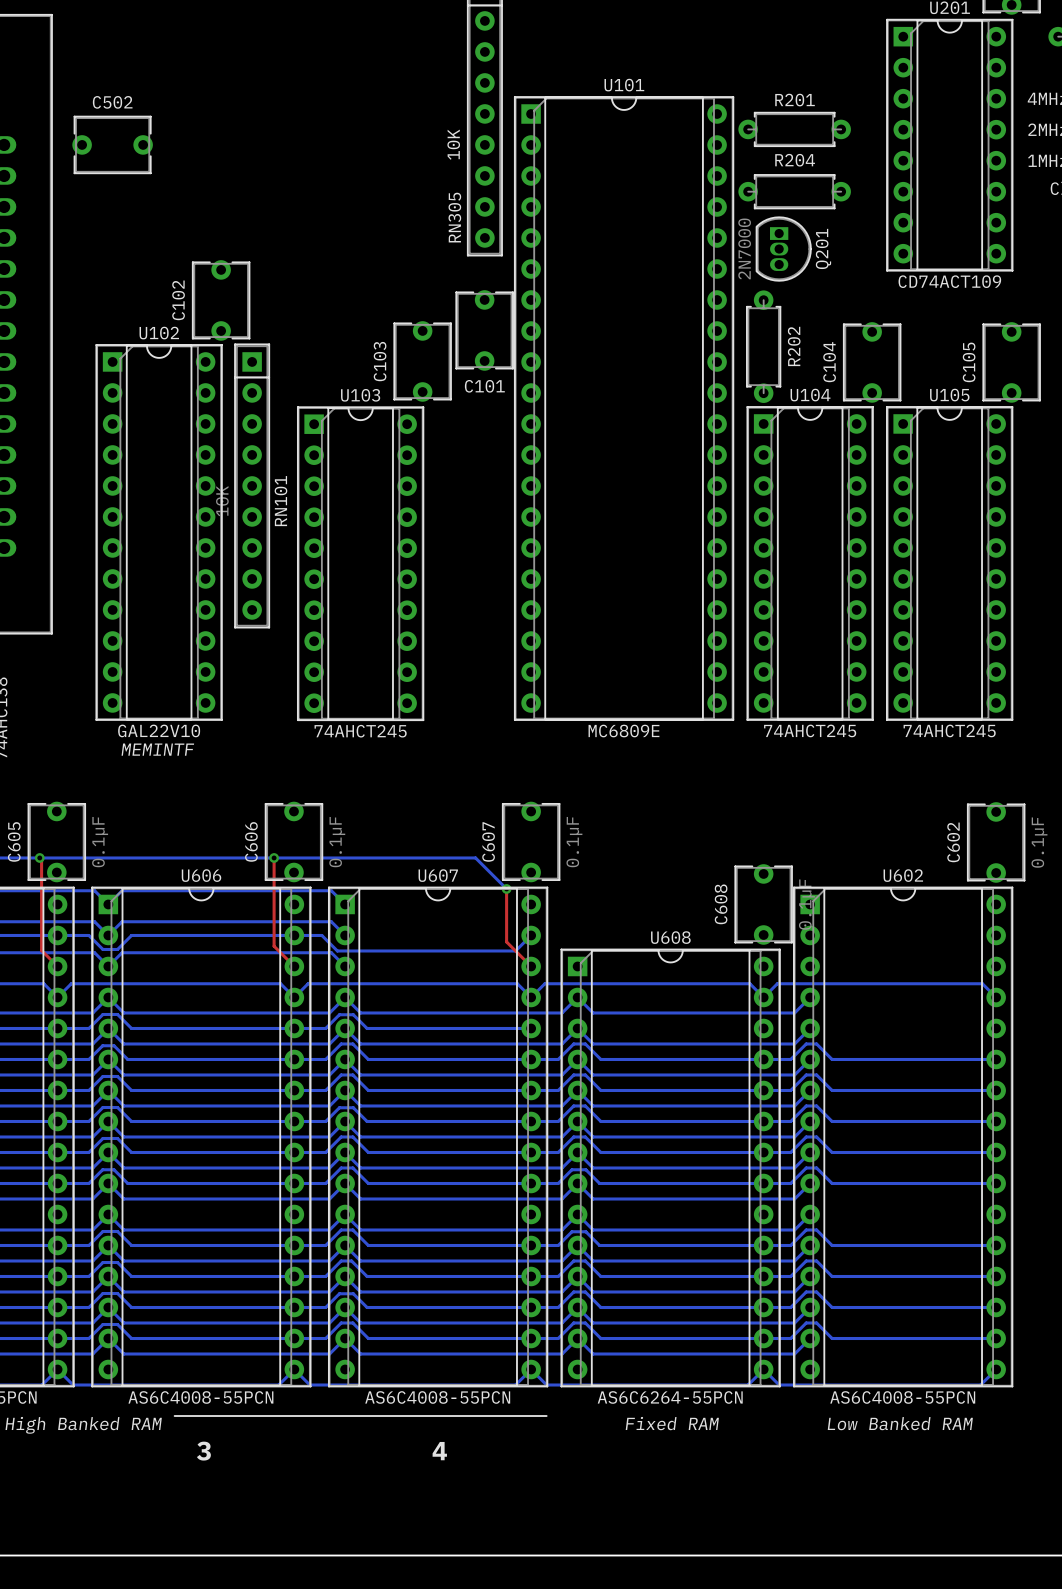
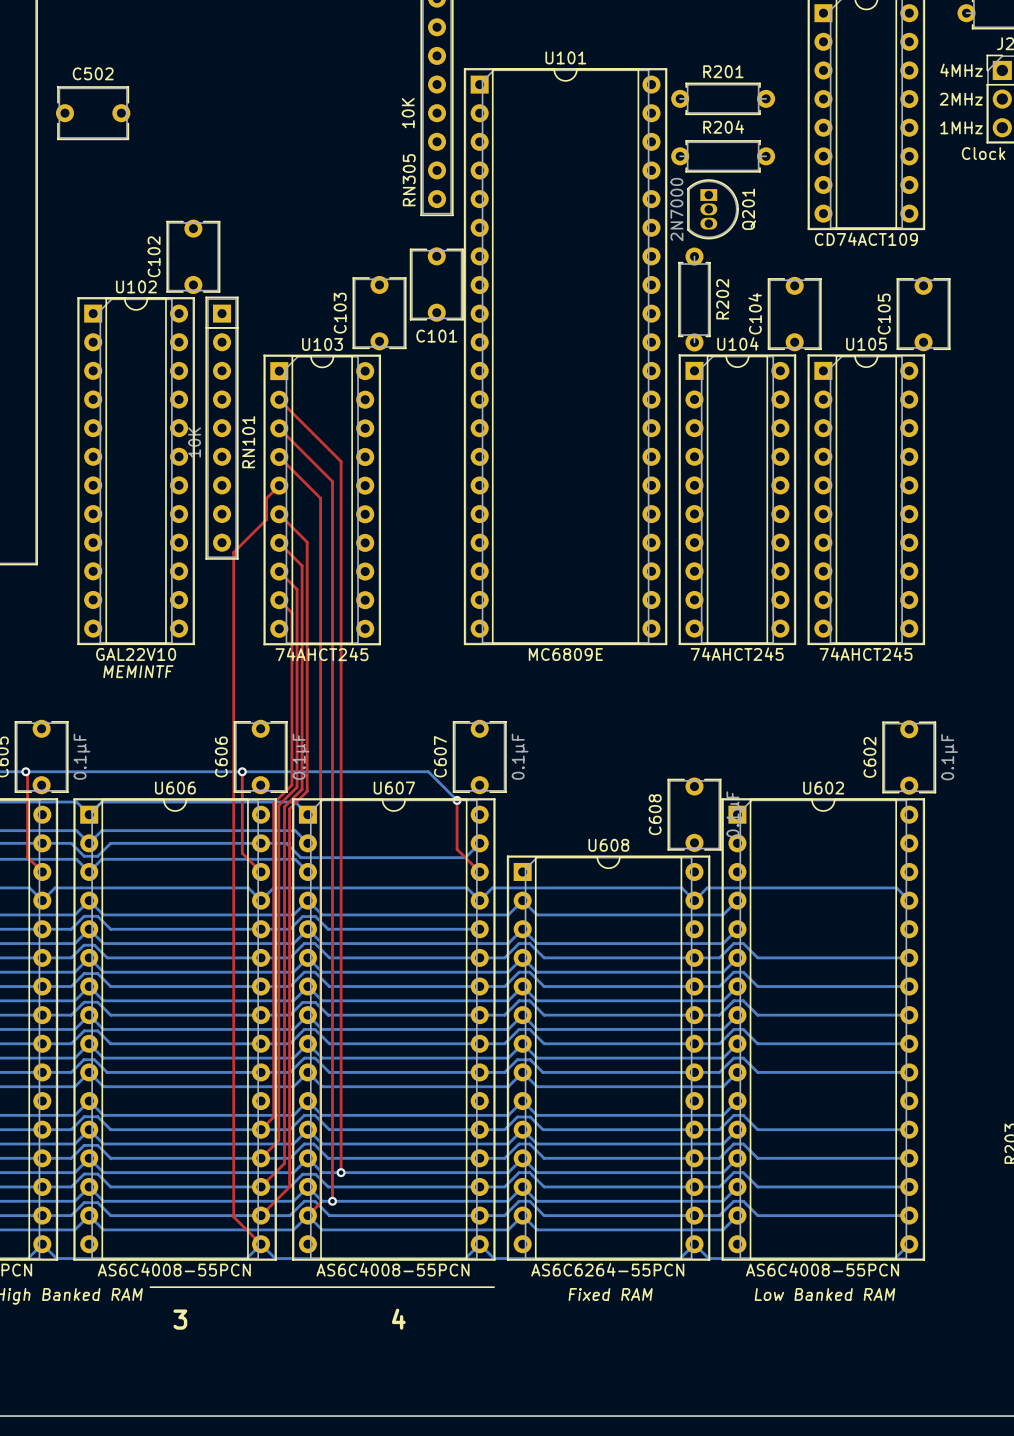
top track: none -> (279, 399) (341, 461) (341, 1172)
top track: none -> (279, 428) (332, 481) (332, 1201)
top track: none -> (279, 457) (320, 498) (320, 1202) (307, 1215)
top track: none -> (279, 485) (266, 498) (266, 519) (233, 552) (233, 1216) (261, 1244)
top track: none -> (279, 514) (307, 542) (307, 791) (289, 808) (289, 1187) (261, 1215)
top track: none -> (279, 542) (302, 565) (302, 789) (284, 806) (284, 1163) (261, 1186)
top track: none -> (279, 571) (297, 589) (297, 787) (278, 805) (278, 1140) (261, 1158)
top track: none -> (279, 600) (291, 612) (291, 785) (273, 803) (273, 1117) (261, 1129)
via: none -> (341, 1172)
via: none -> (332, 1201)

